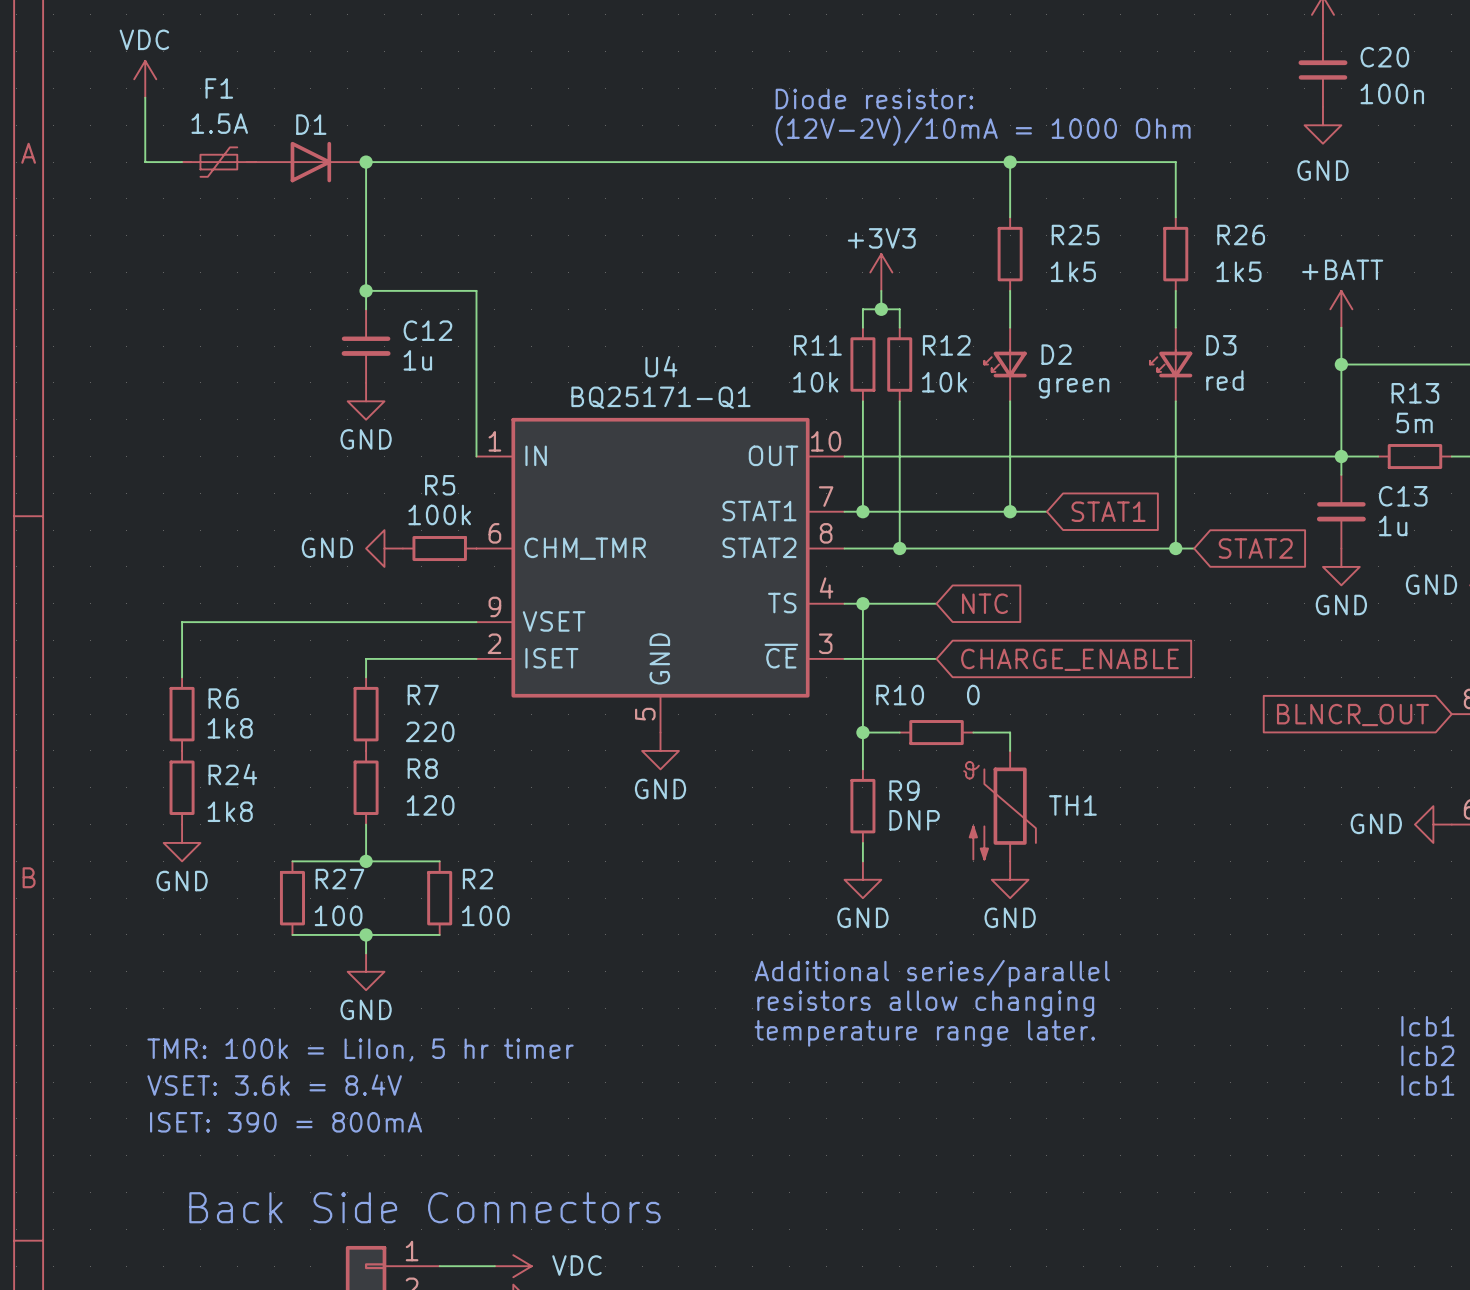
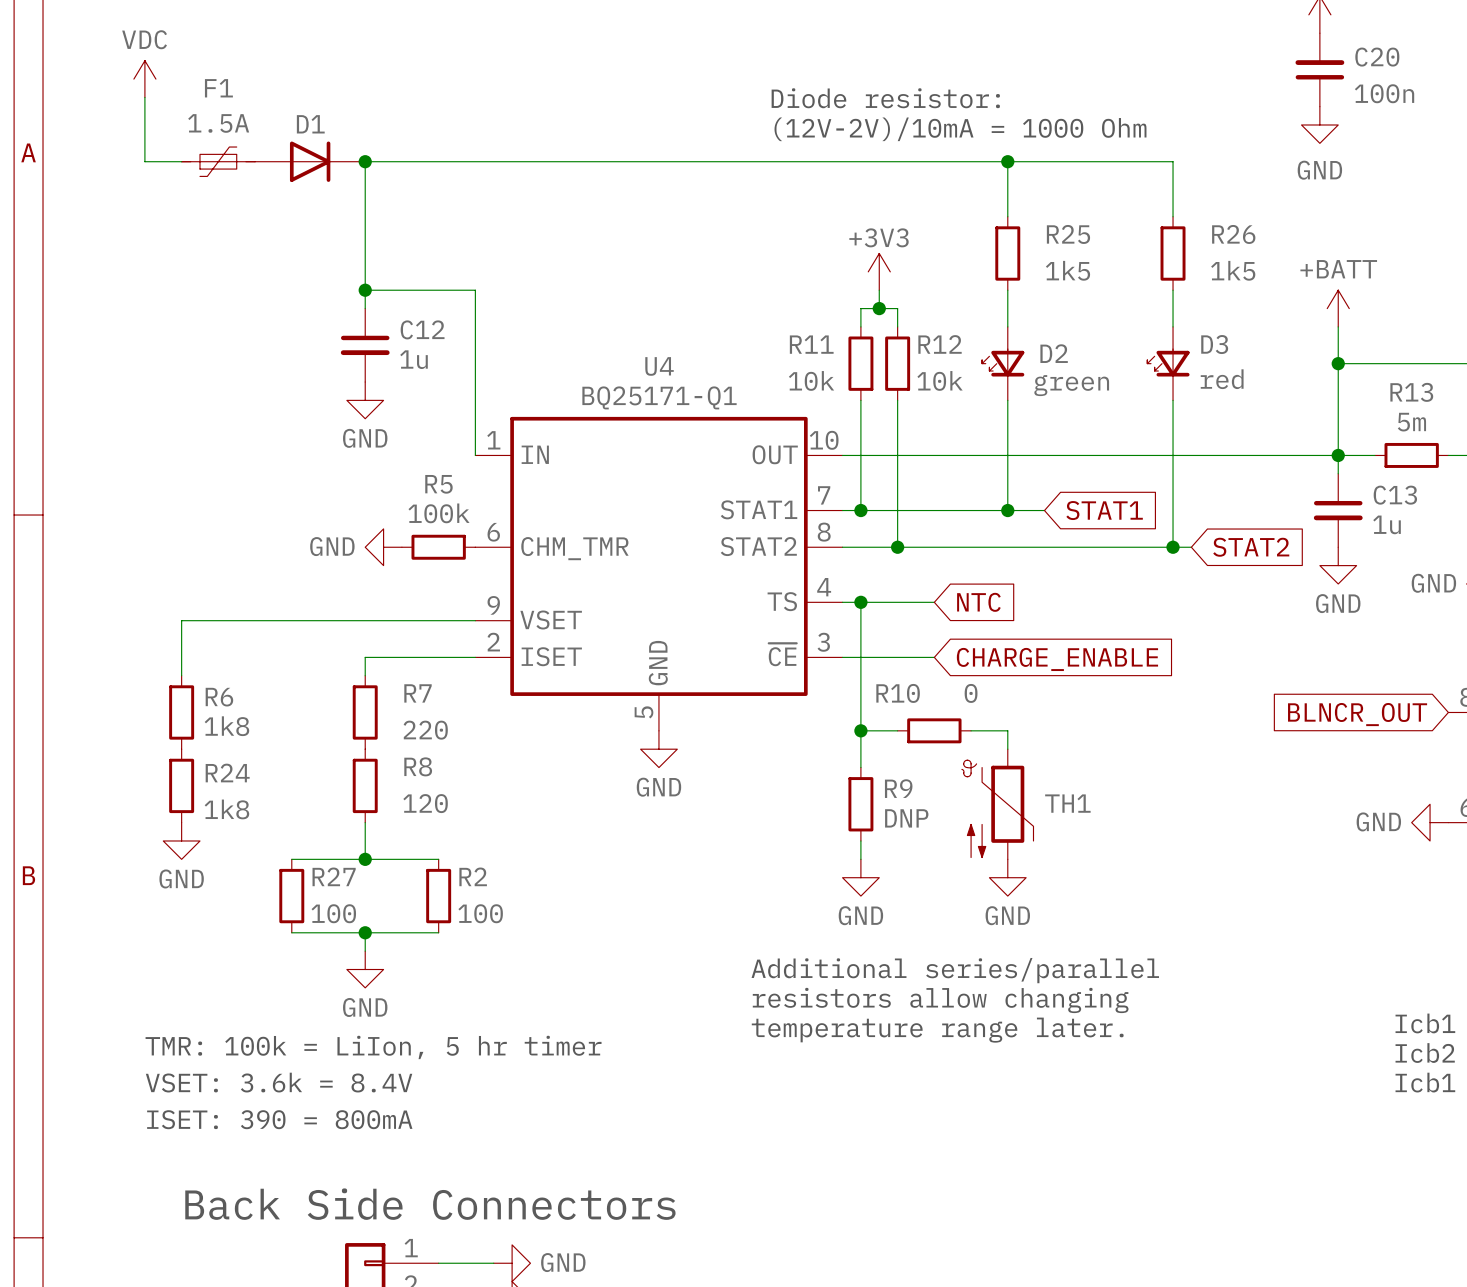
power symbol: VDC (513, 1266) -> GND (512, 1263)

